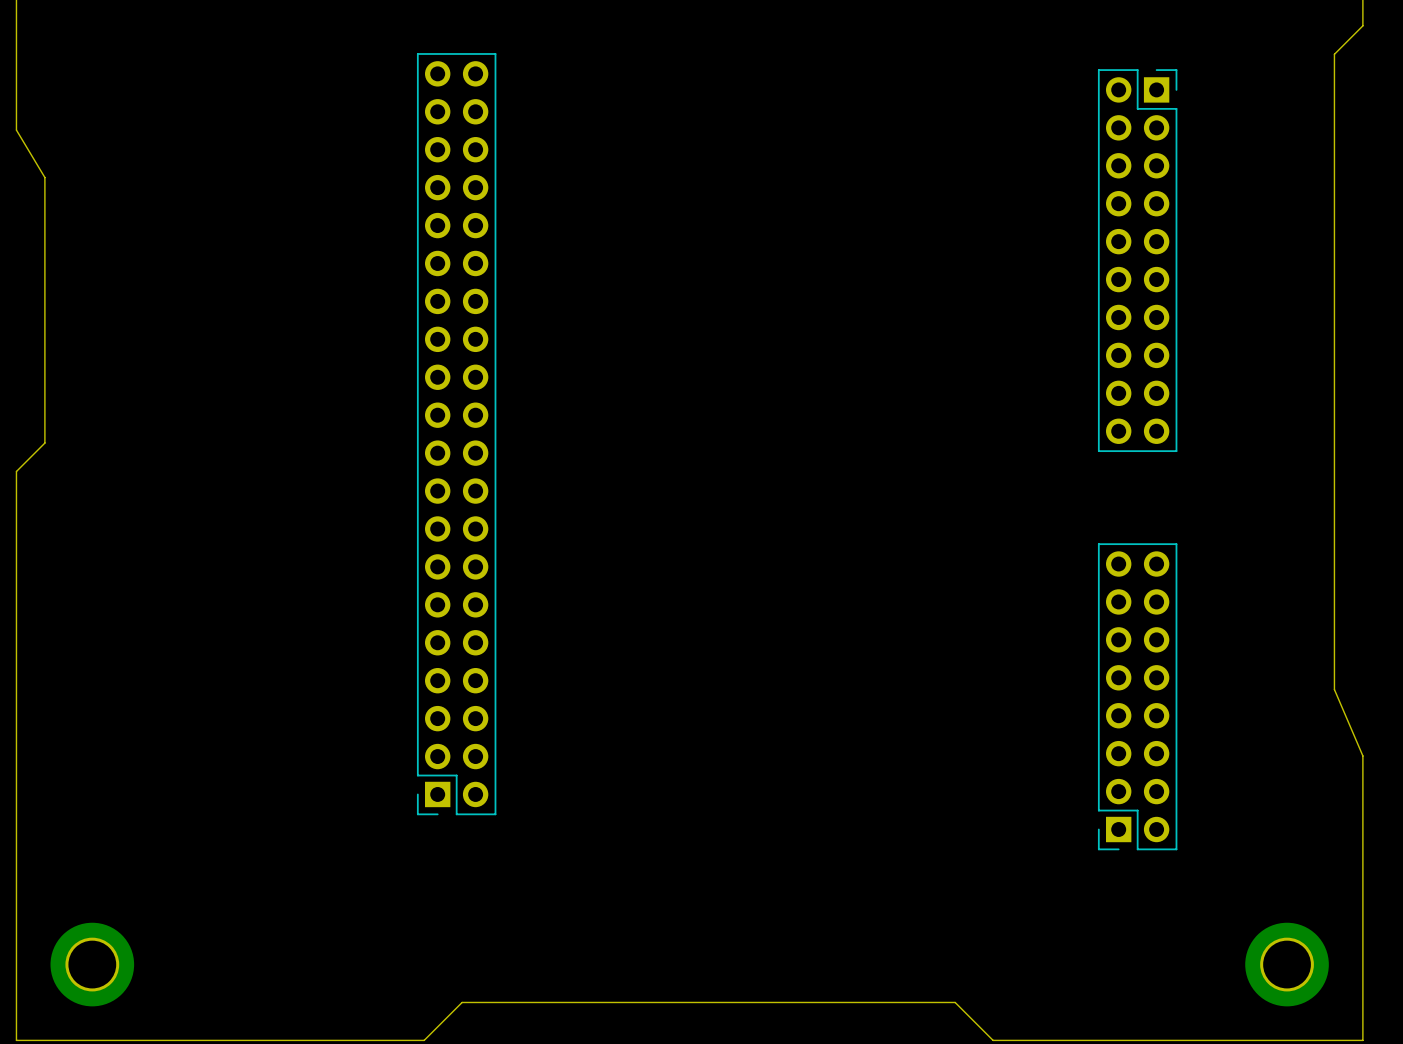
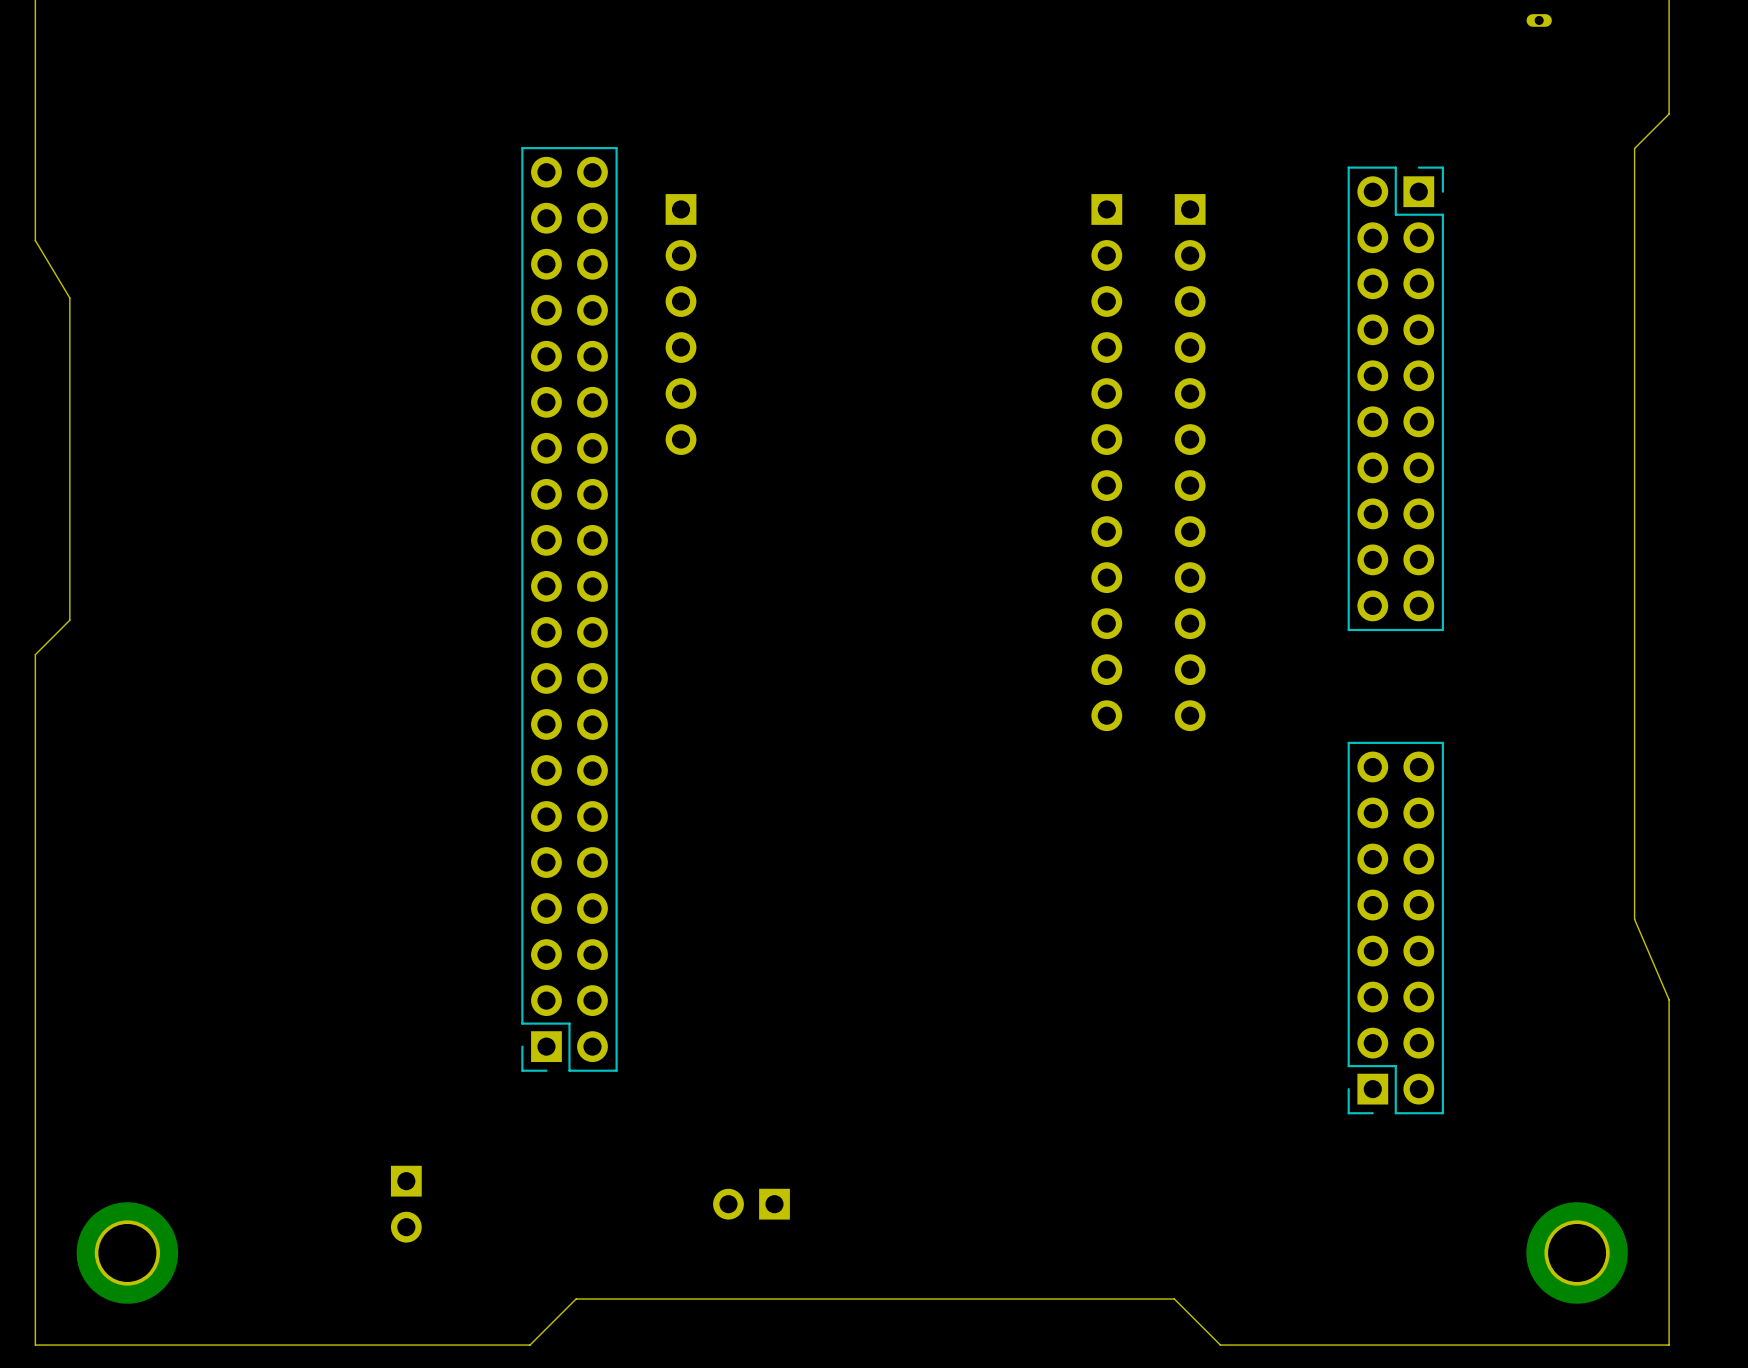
part: none -> (681, 324)
part: none -> (1106, 462)
part: none -> (1190, 462)
part: none -> (406, 1204)
part: none -> (751, 1204)

